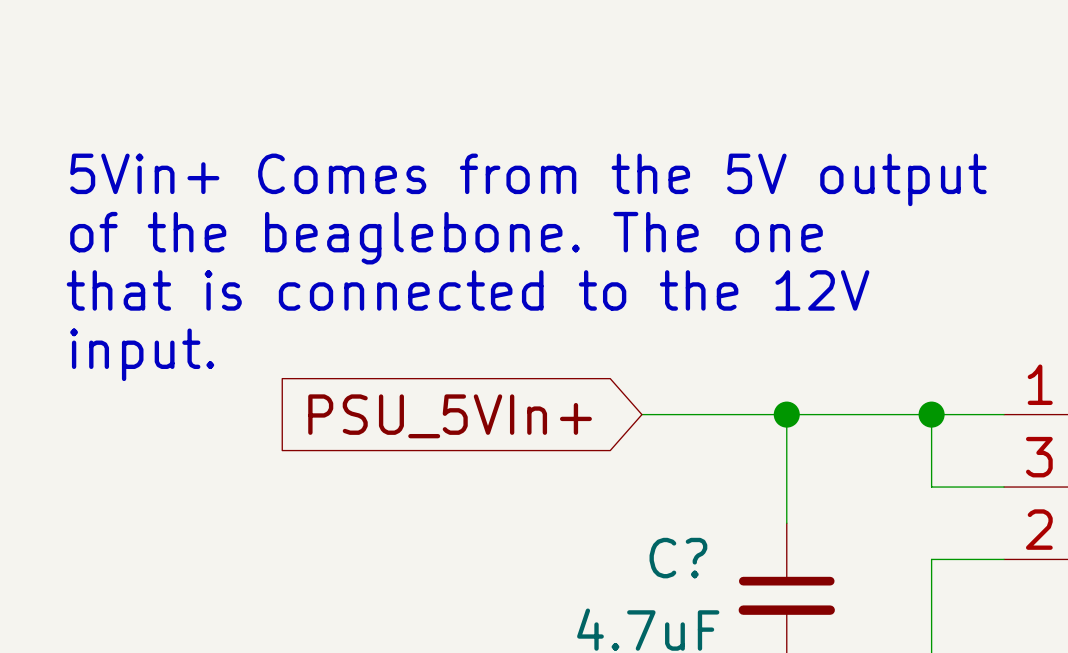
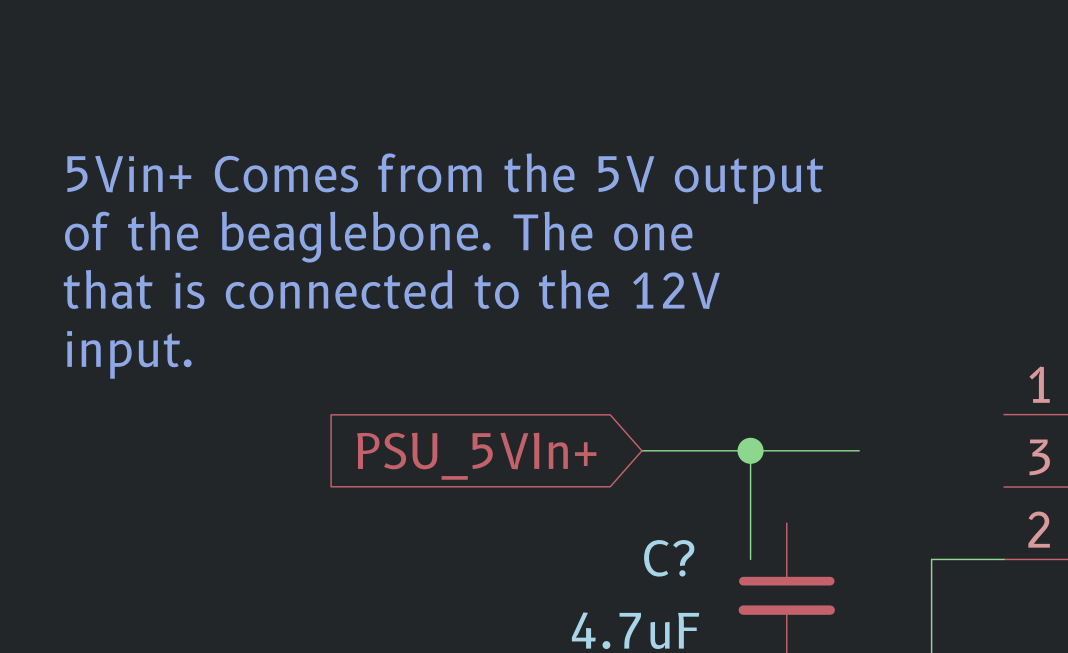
wire: (641, 414) (1004, 414) -> none
wire: (786, 414) (786, 523) -> (750, 450) (750, 559)
junction position: (786, 414) -> (750, 450)
wire: (931, 414) (931, 487) (1004, 487) -> none
junction: (931, 414) -> none
global label position: PSU_5VIn+ (450, 416) -> PSU_5VIn+ (476, 456)
wire: none -> (641, 450) (859, 450)

